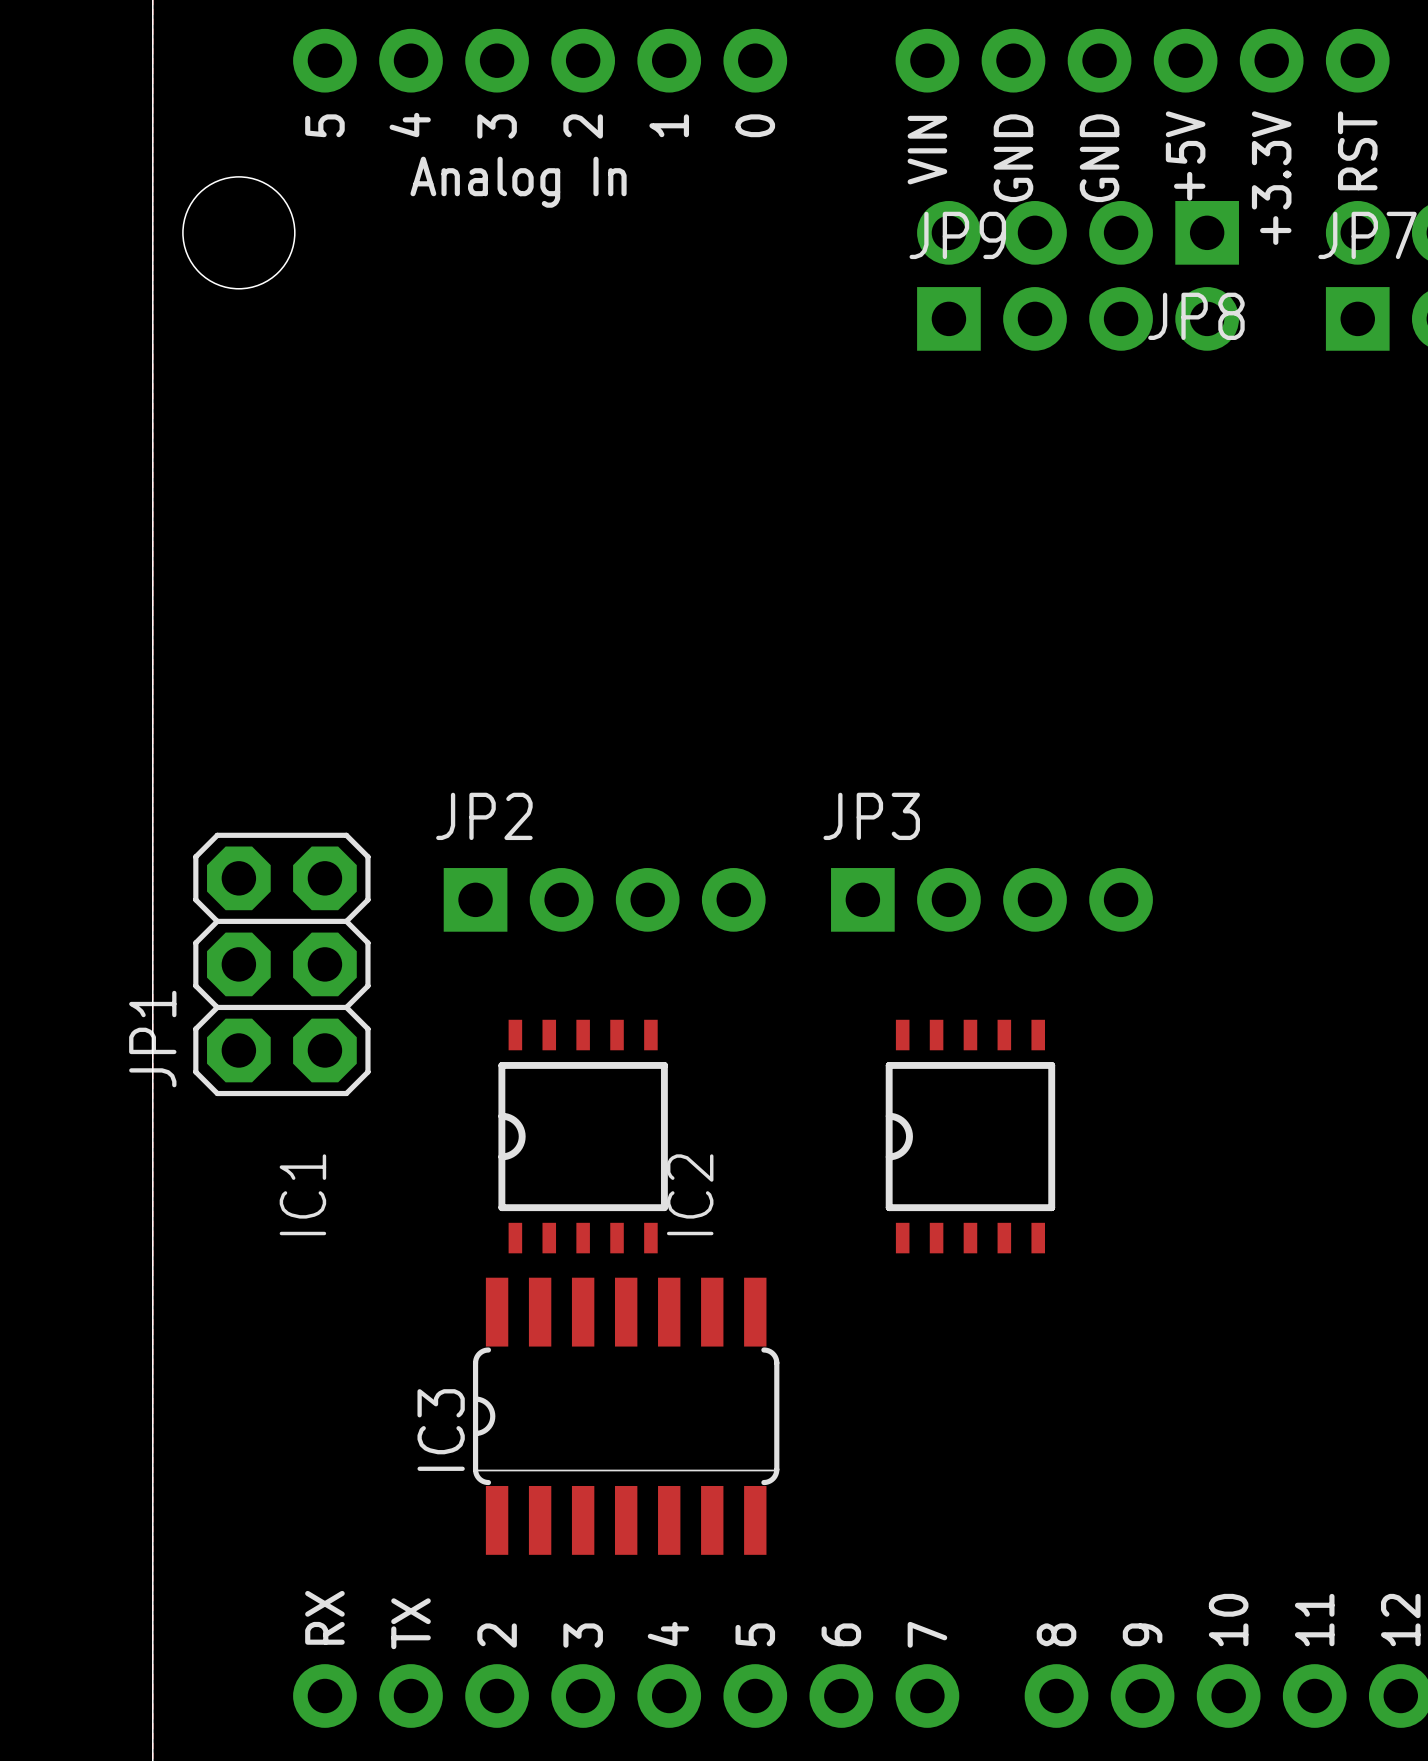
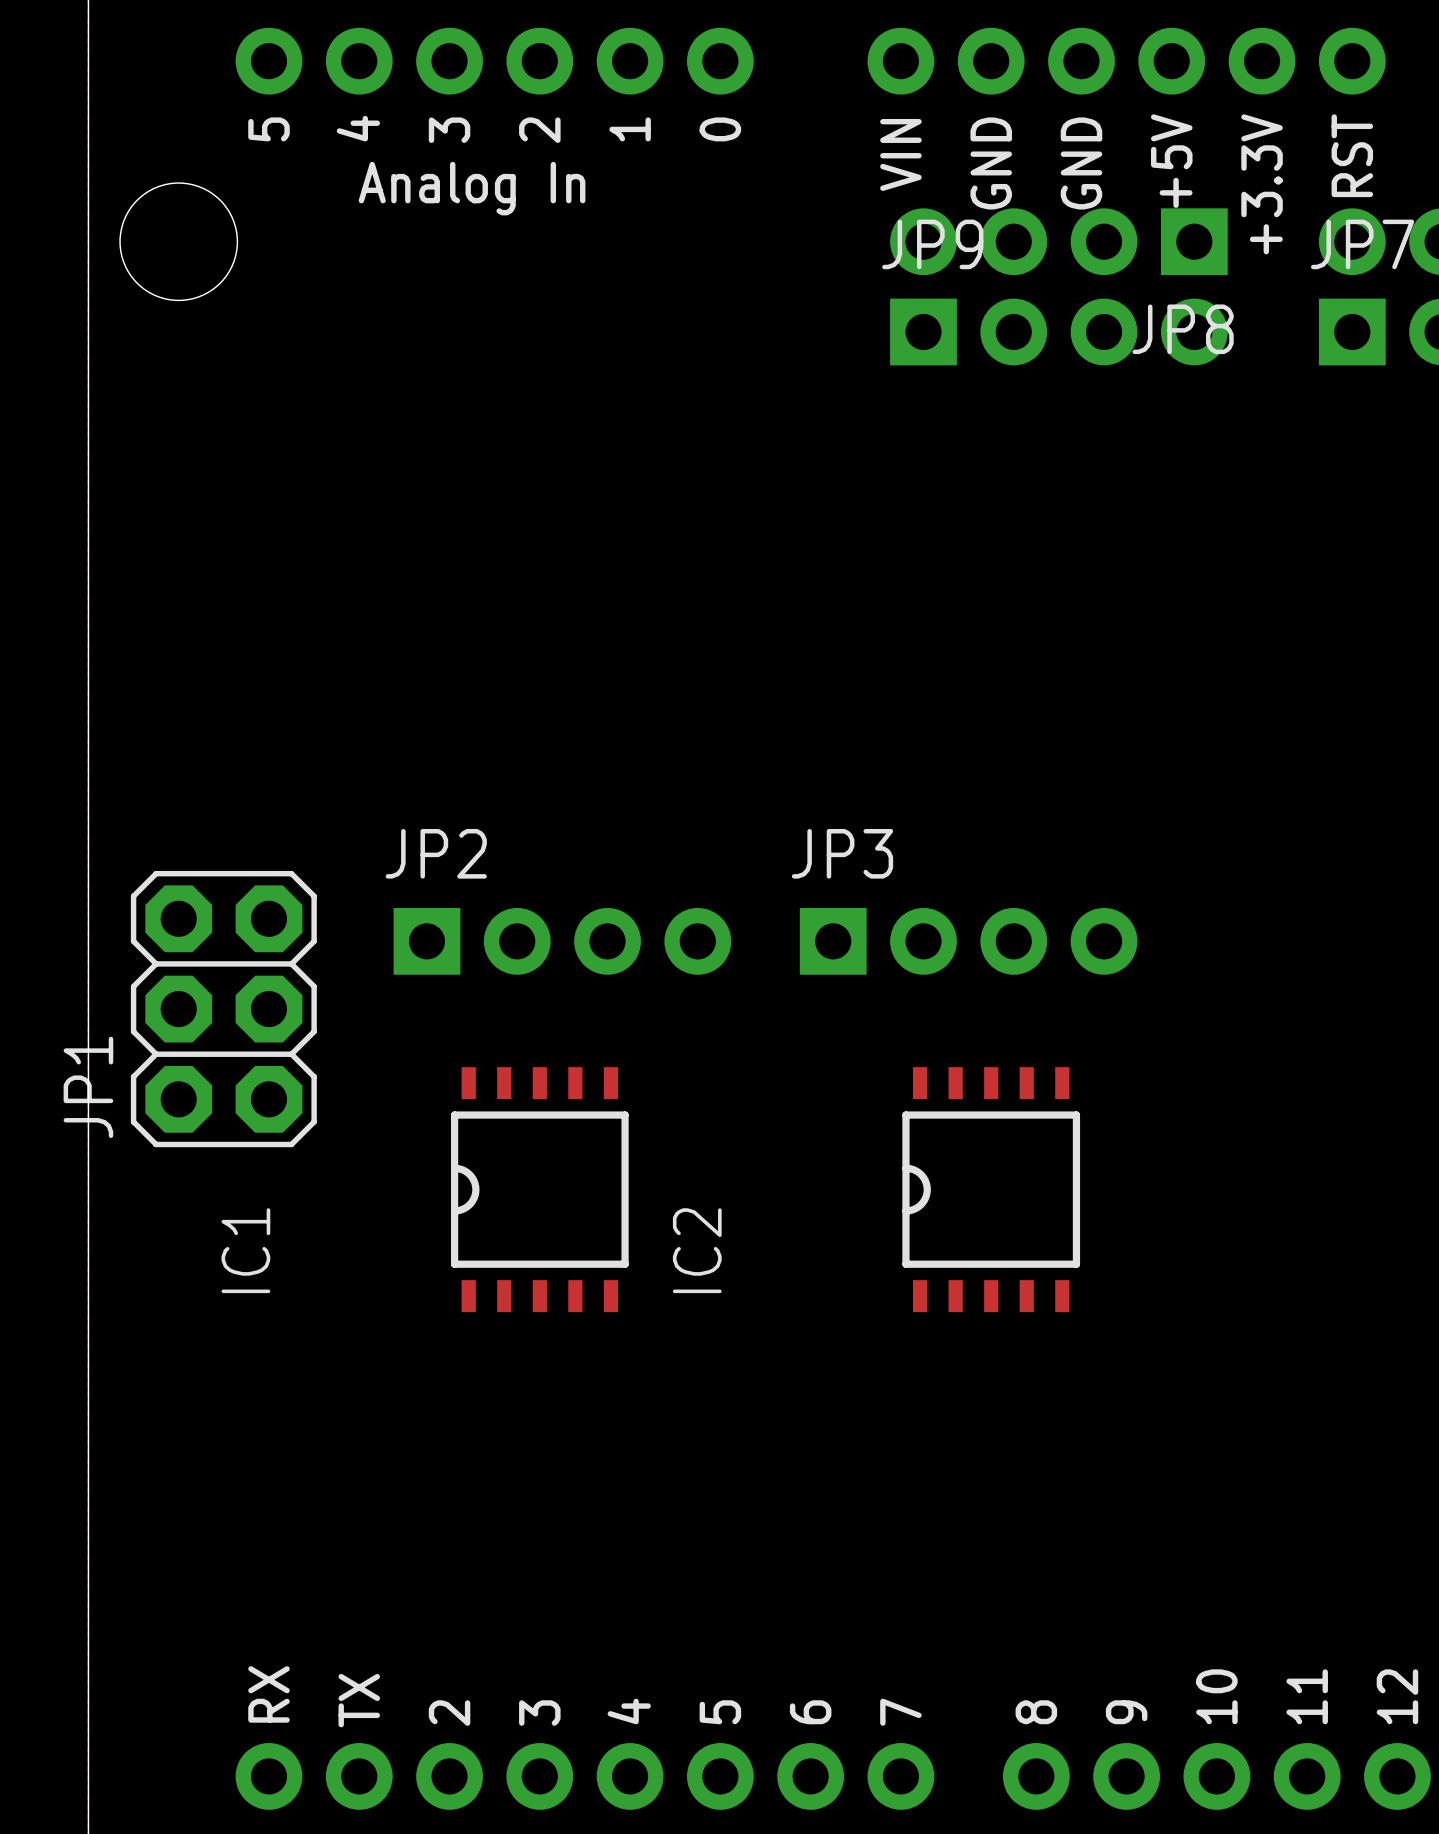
IC2 position: (970, 1136) -> (991, 1189)
IC3: (626, 1416) -> none

